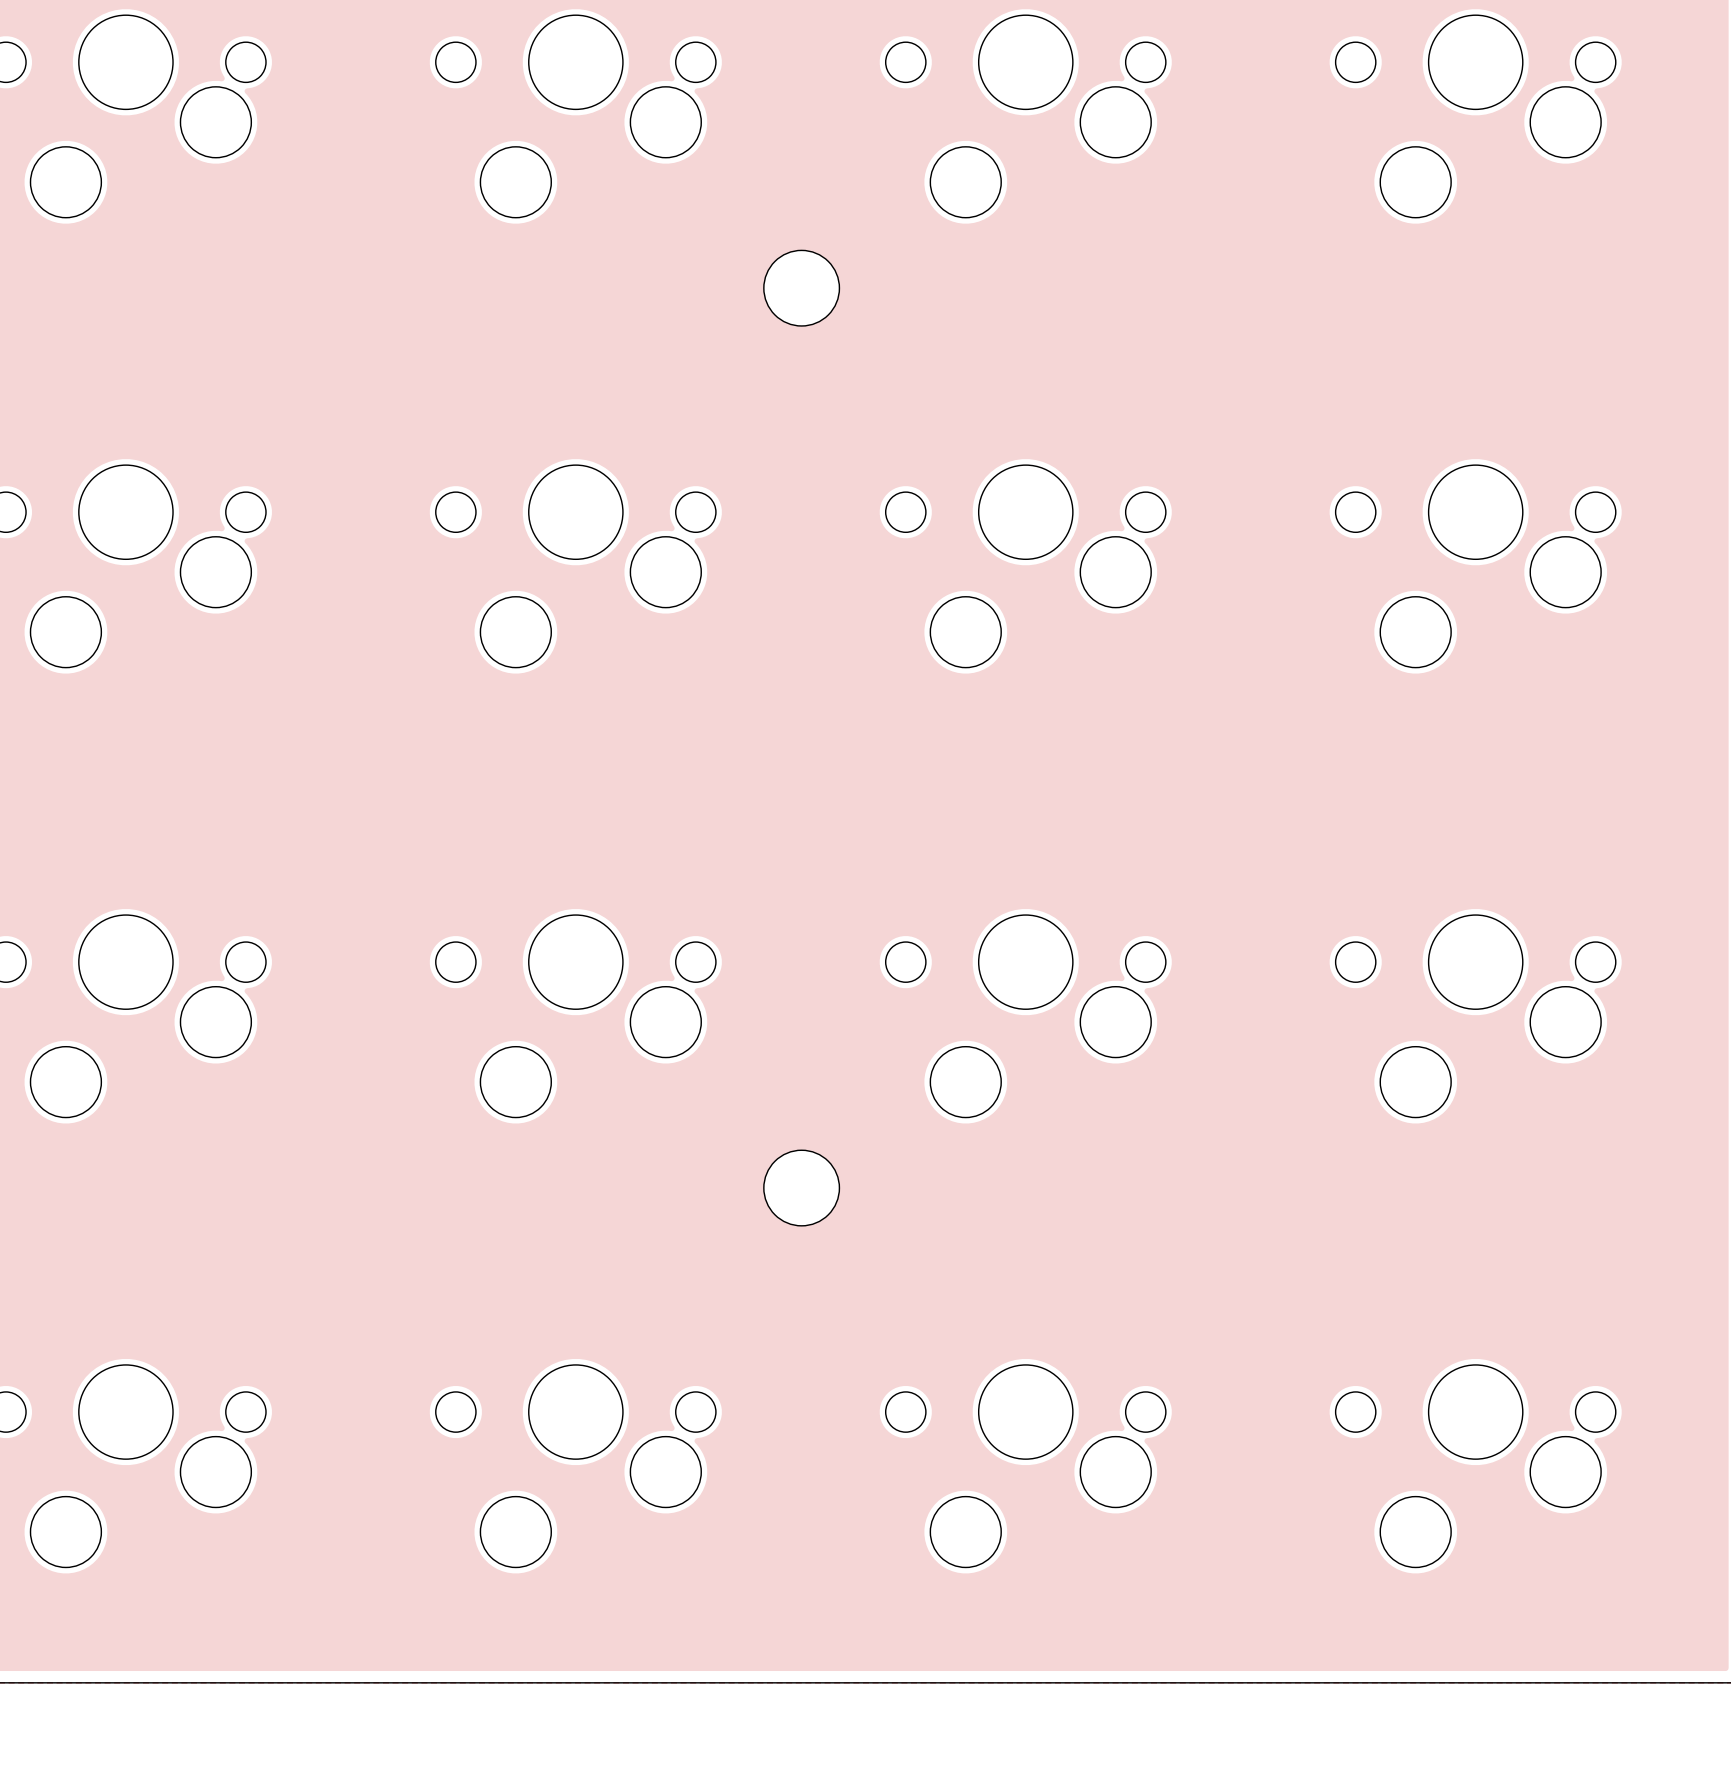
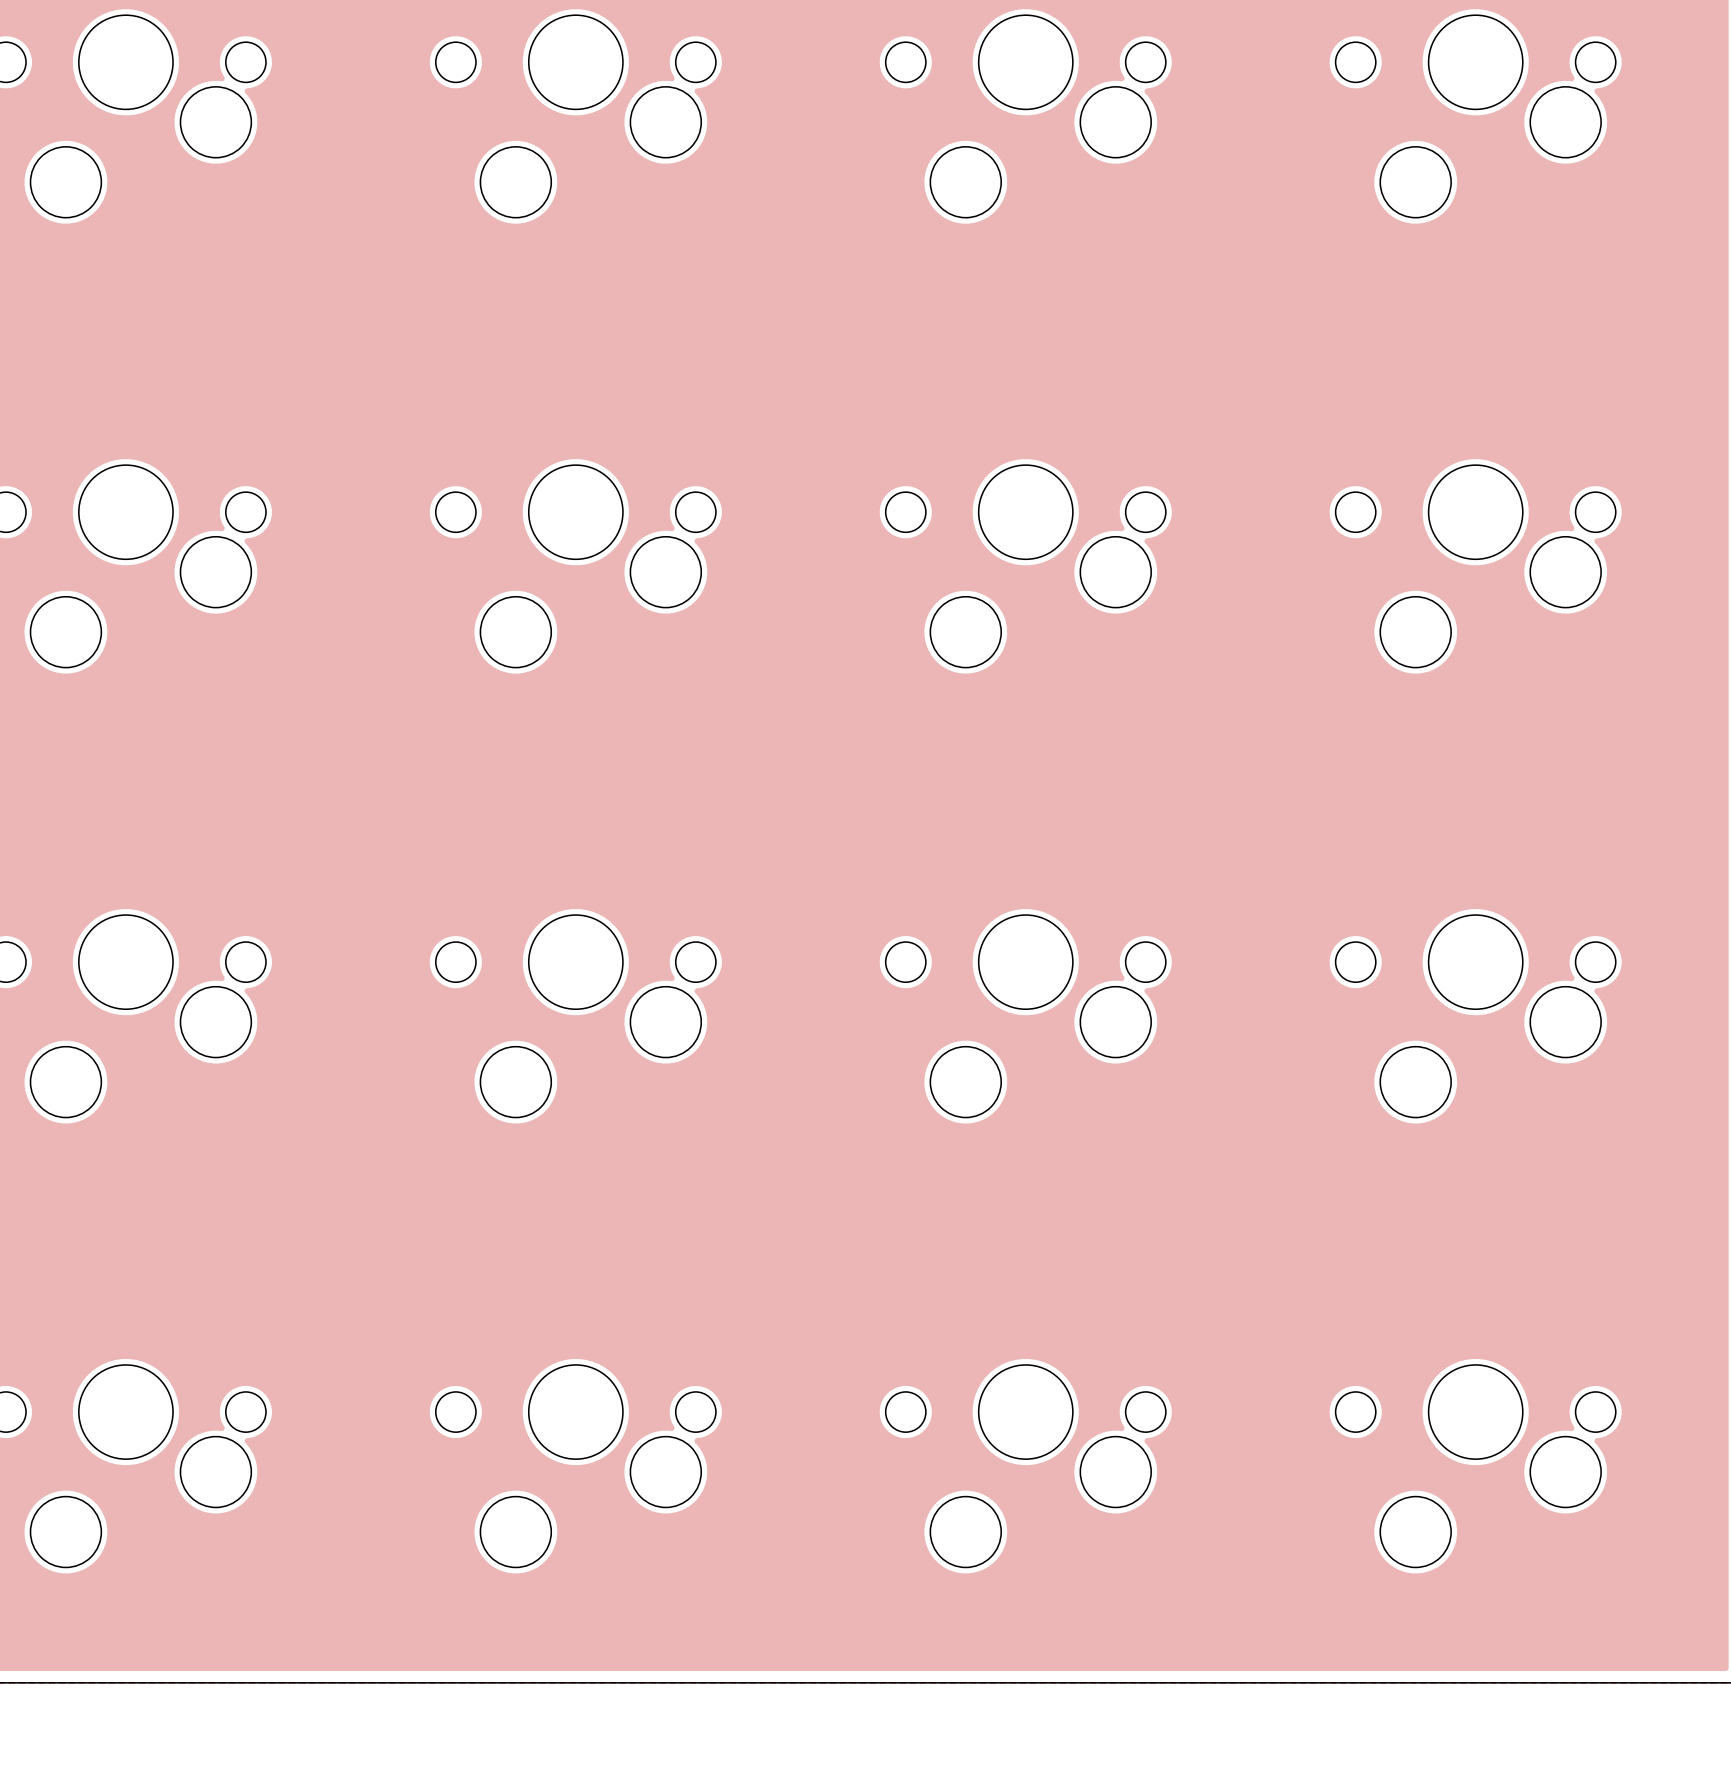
part: (801, 288) -> none
part: (801, 1188) -> none

